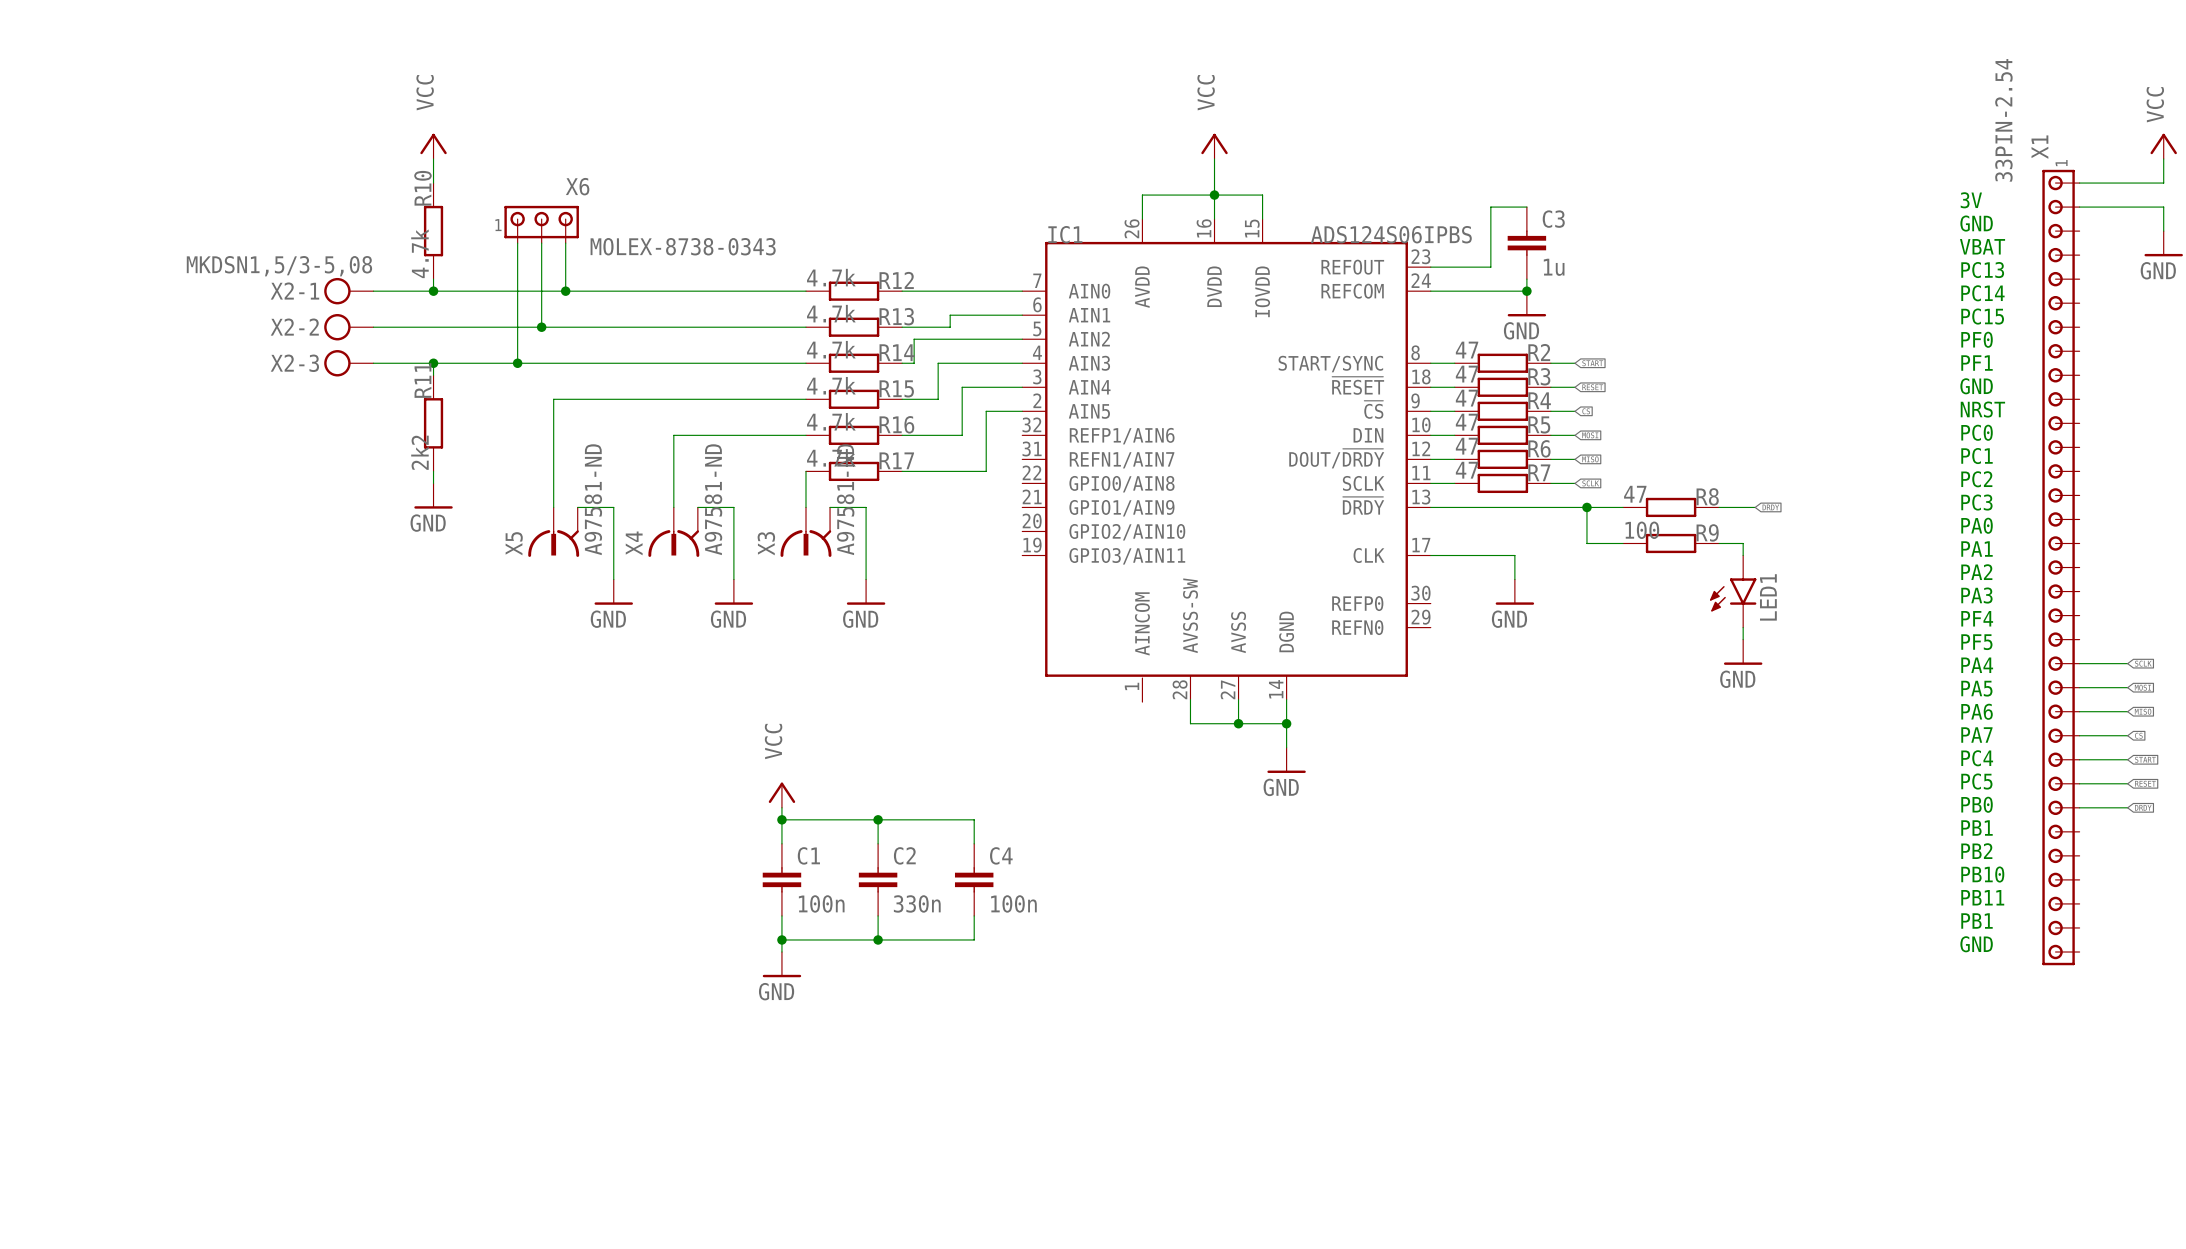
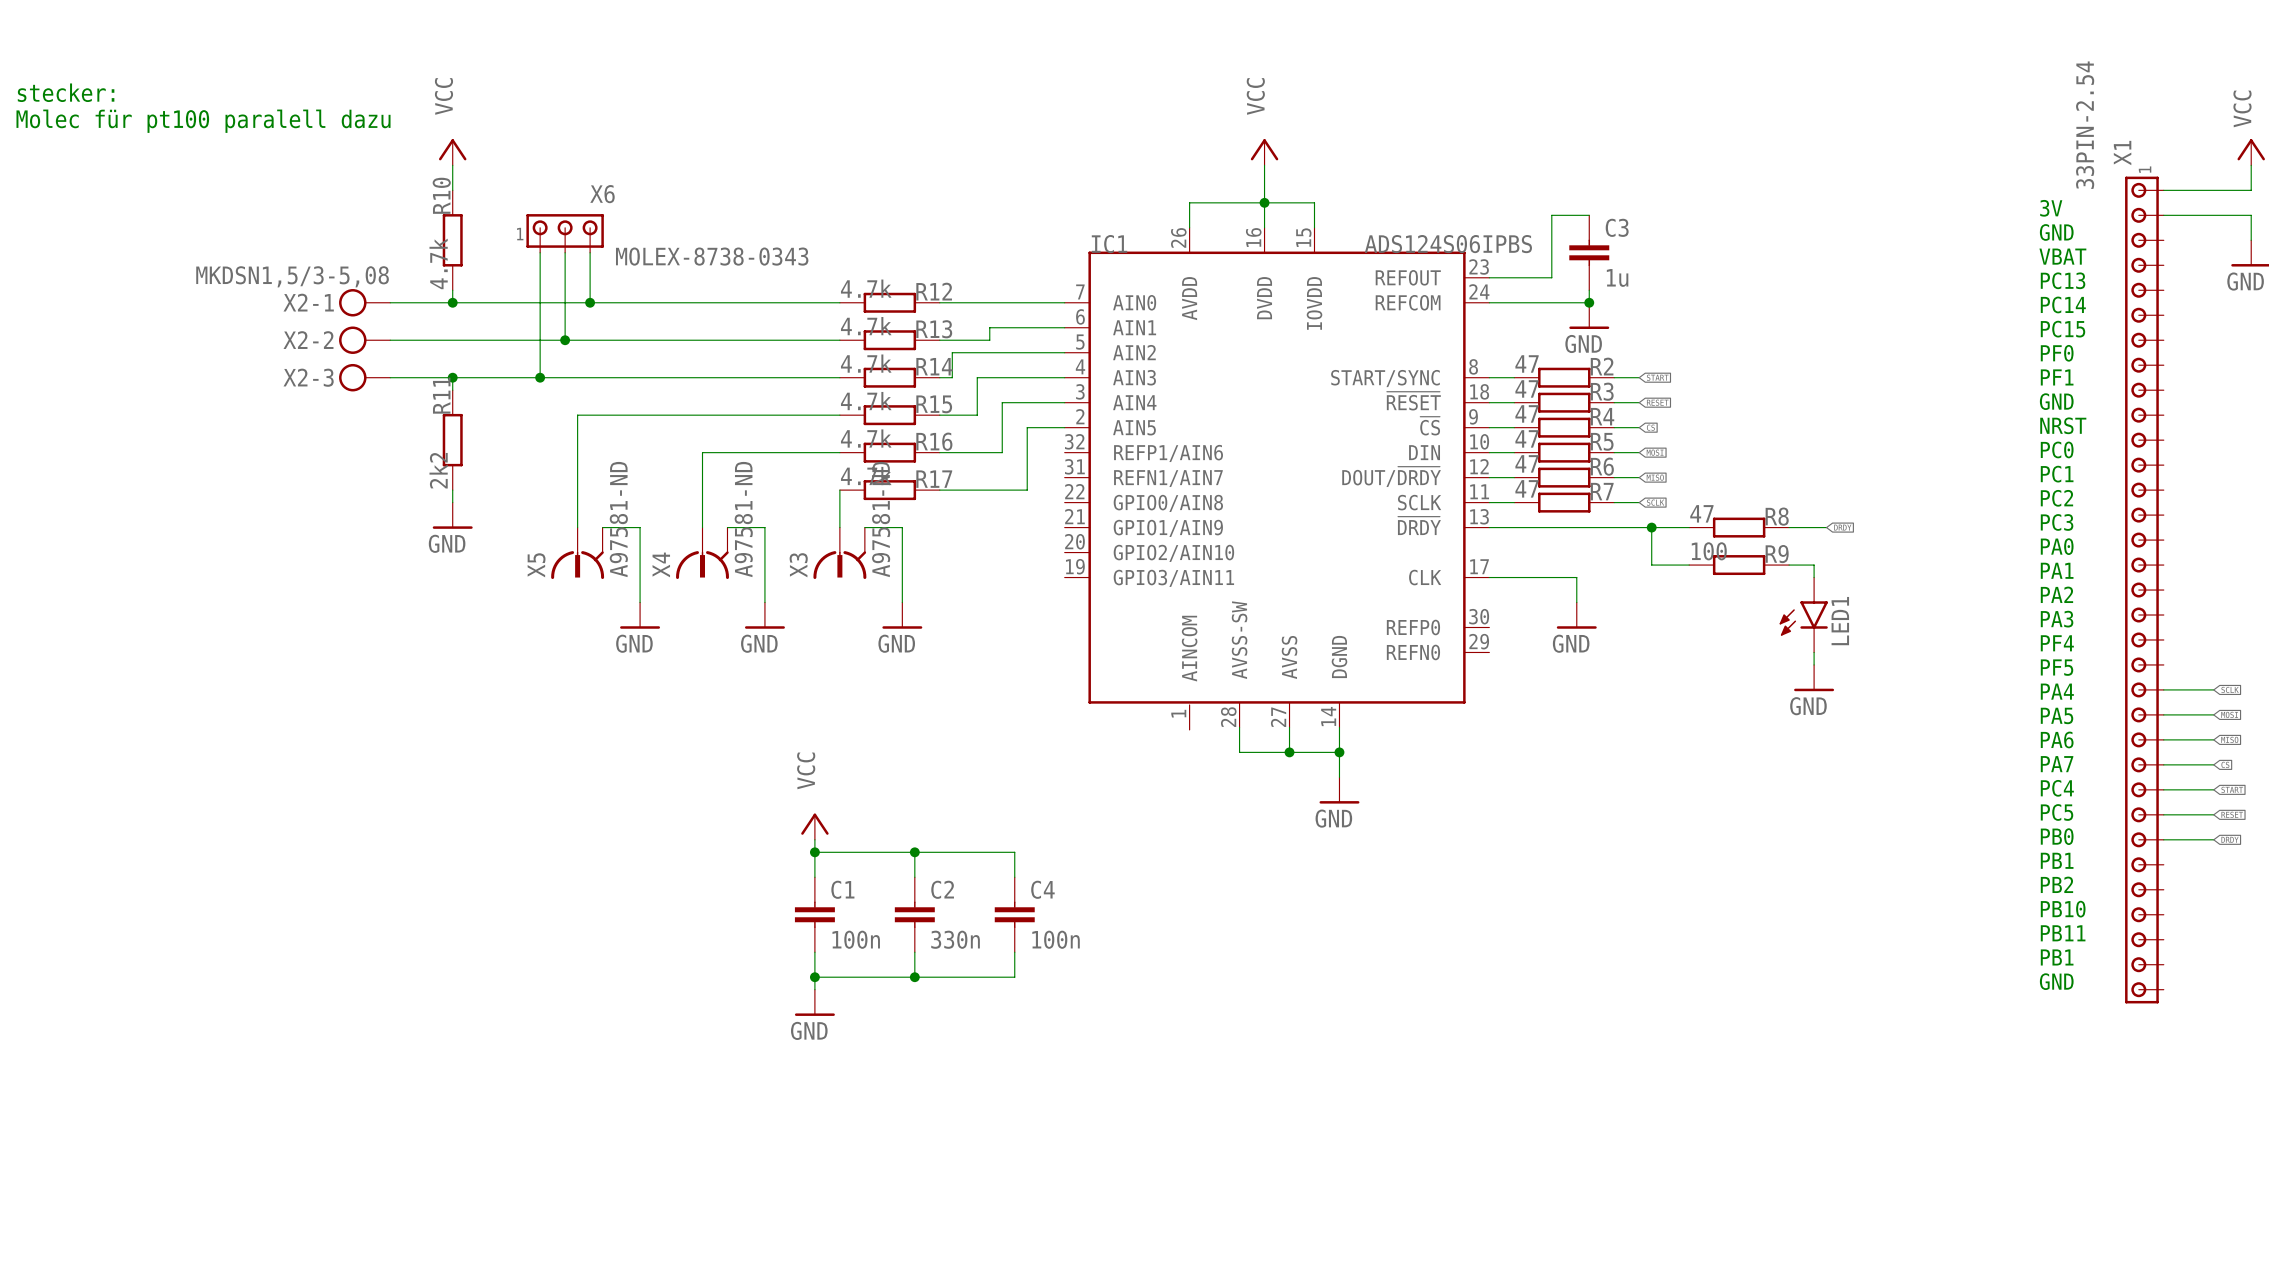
text: none -> stecker: (66, 92)
text: none -> Molec für pt100 paralell dazu (203, 121)

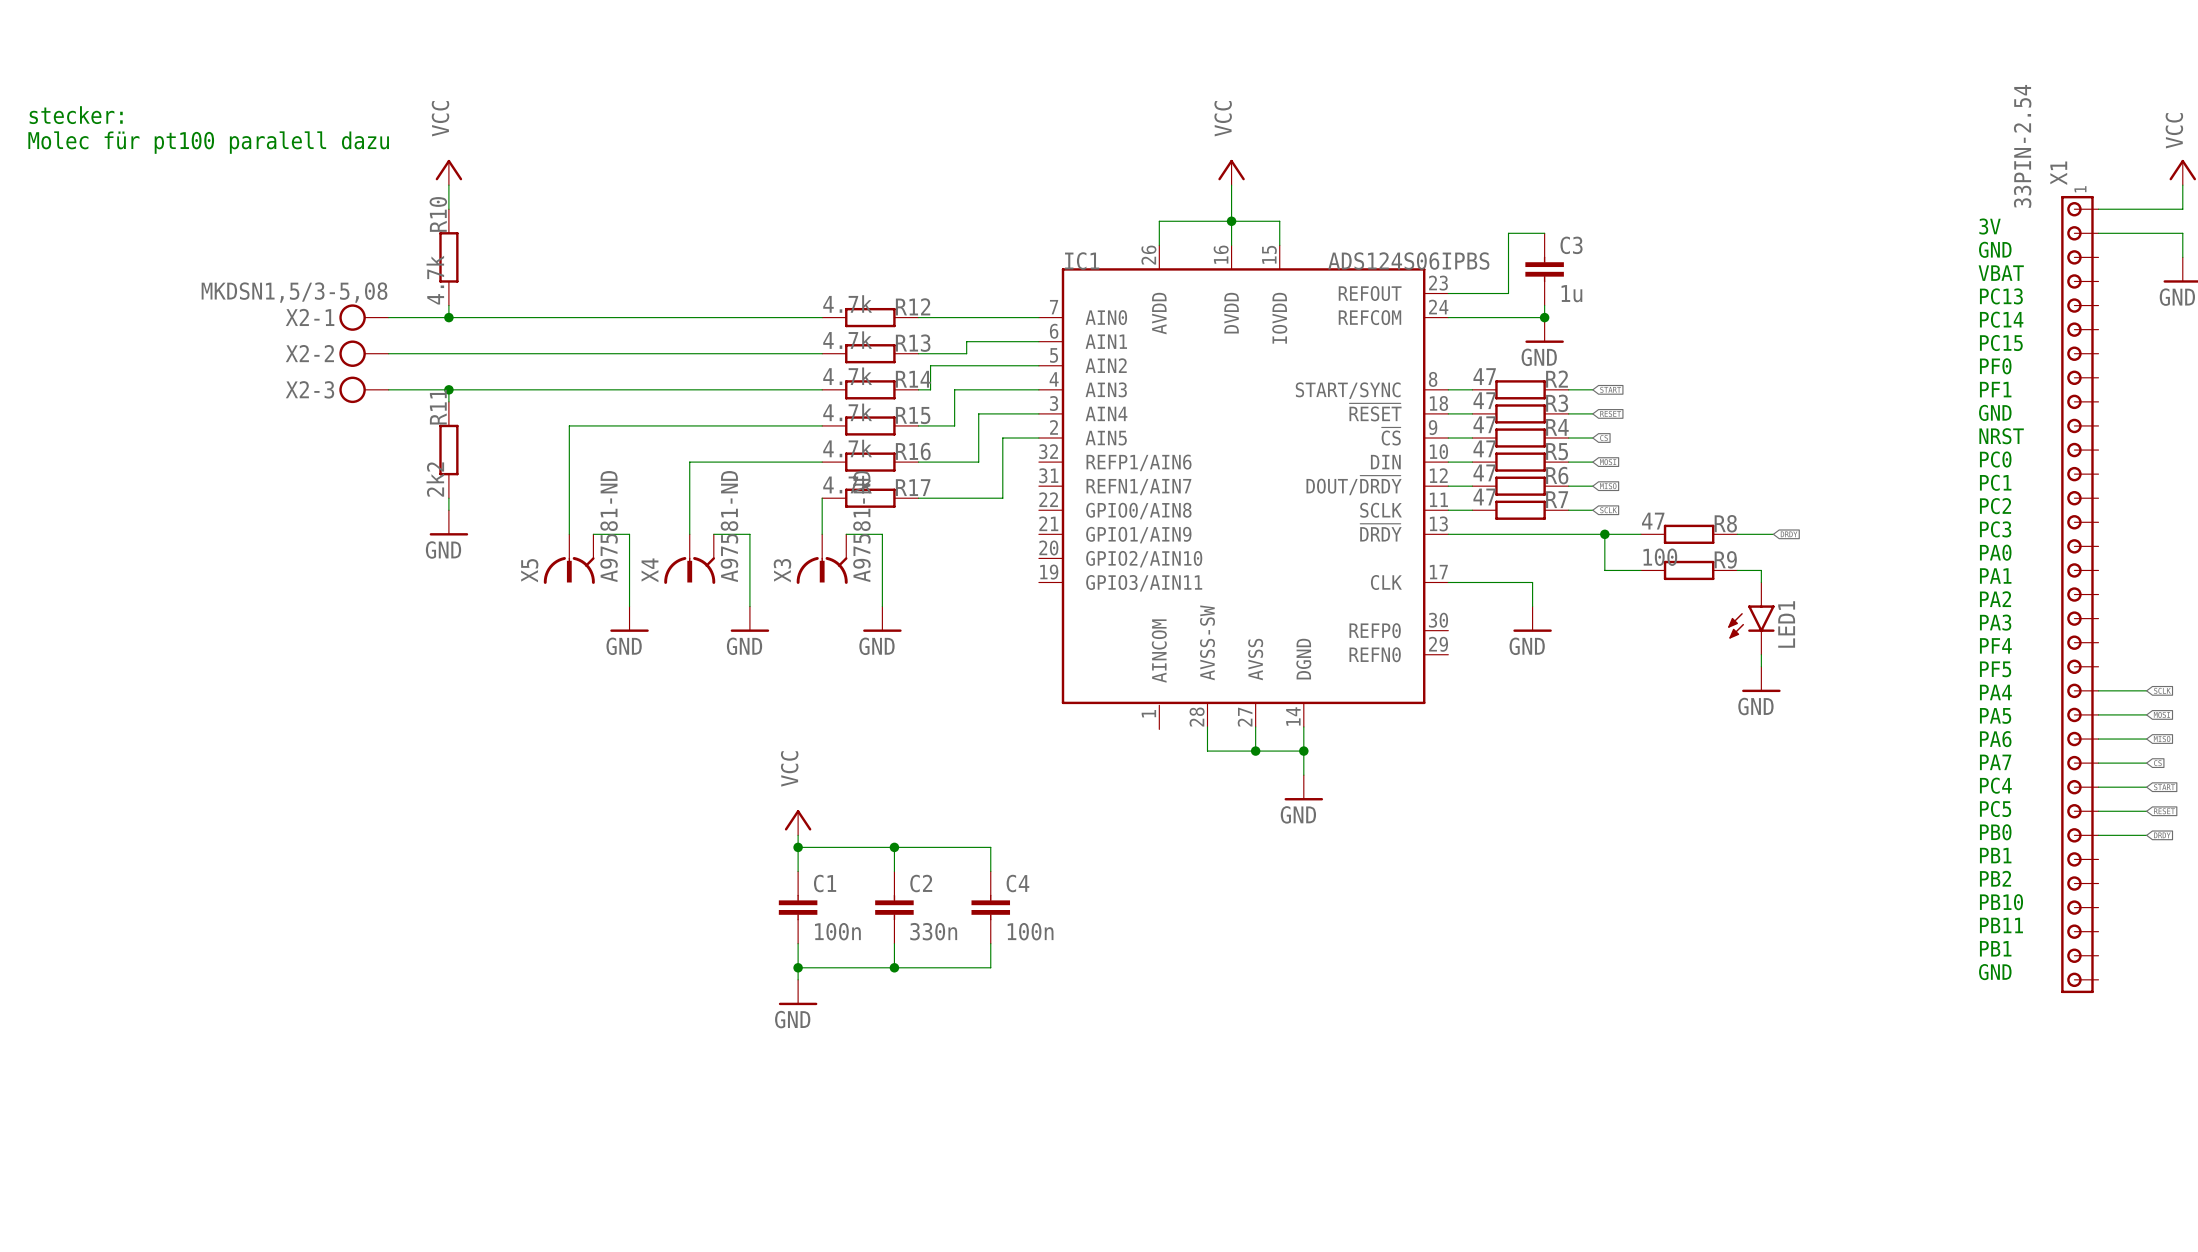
X6: MOLEX-8738-0343 (565, 233) -> none
wire: (540, 252) (540, 377) -> none
wire: (565, 252) (565, 340) -> none
wire: (590, 252) (590, 302) -> none
junction: (590, 302) -> none
junction: (565, 340) -> none
junction: (540, 377) -> none

